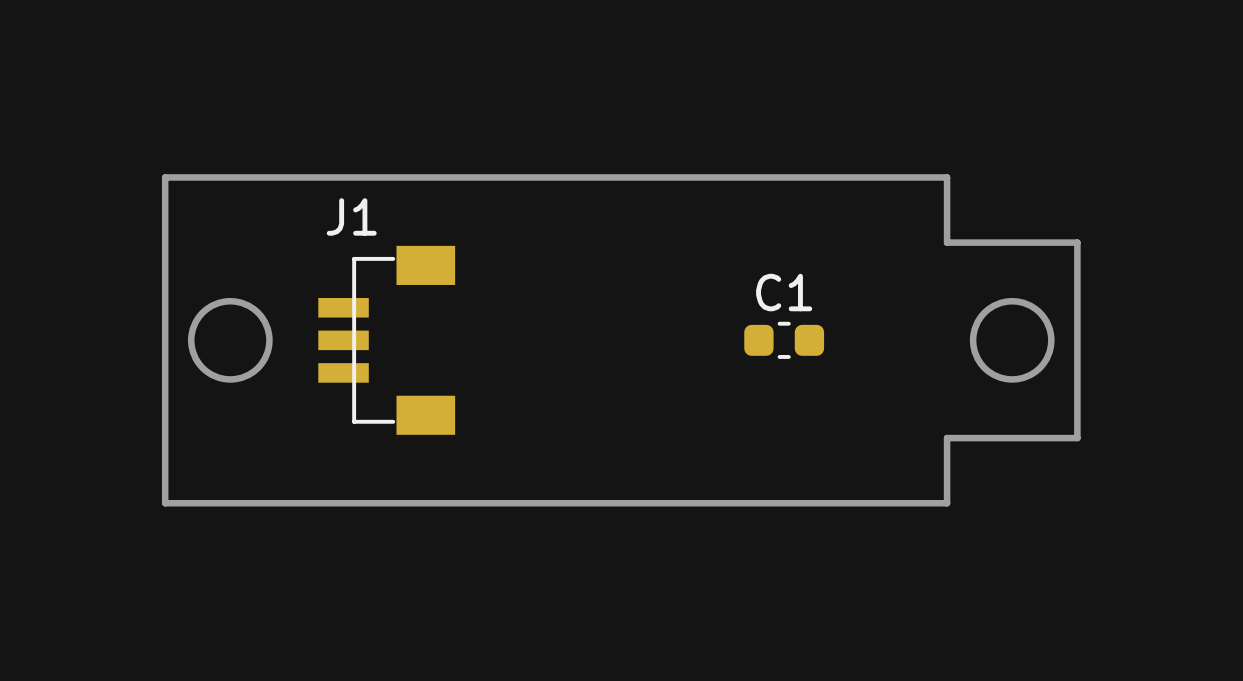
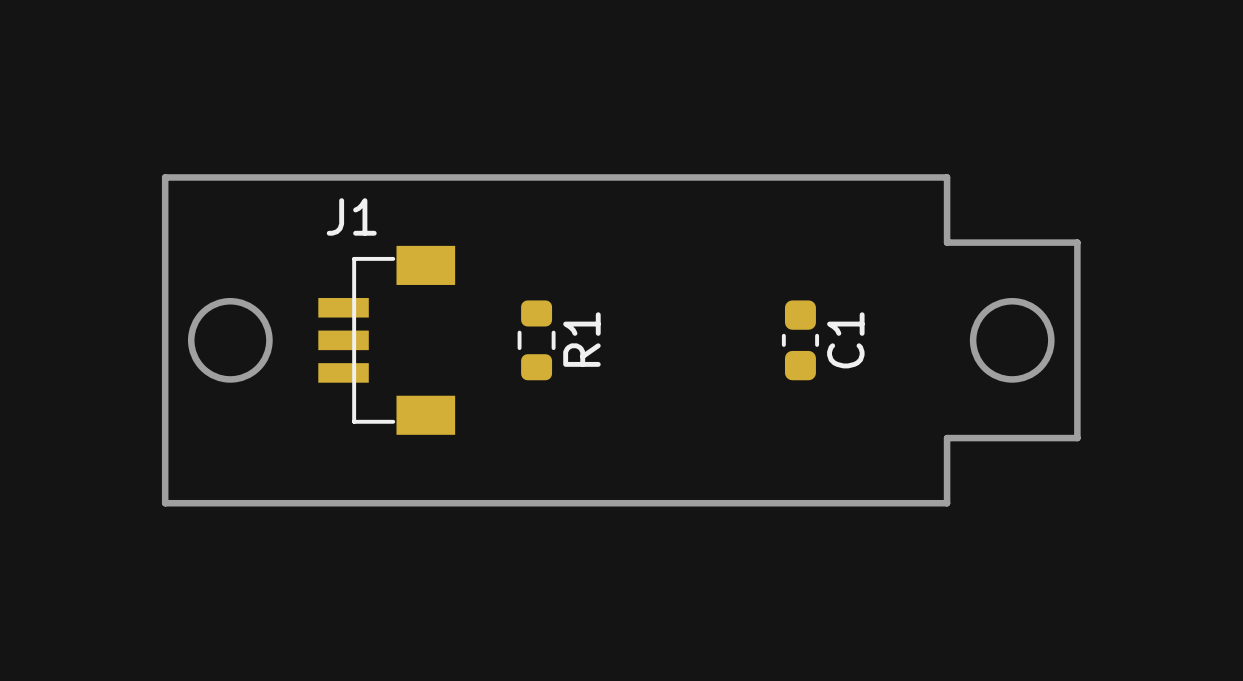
R1: none -> (536, 340)
C1 rotation: 0° (784, 340) -> 90° clockwise (800, 340)

